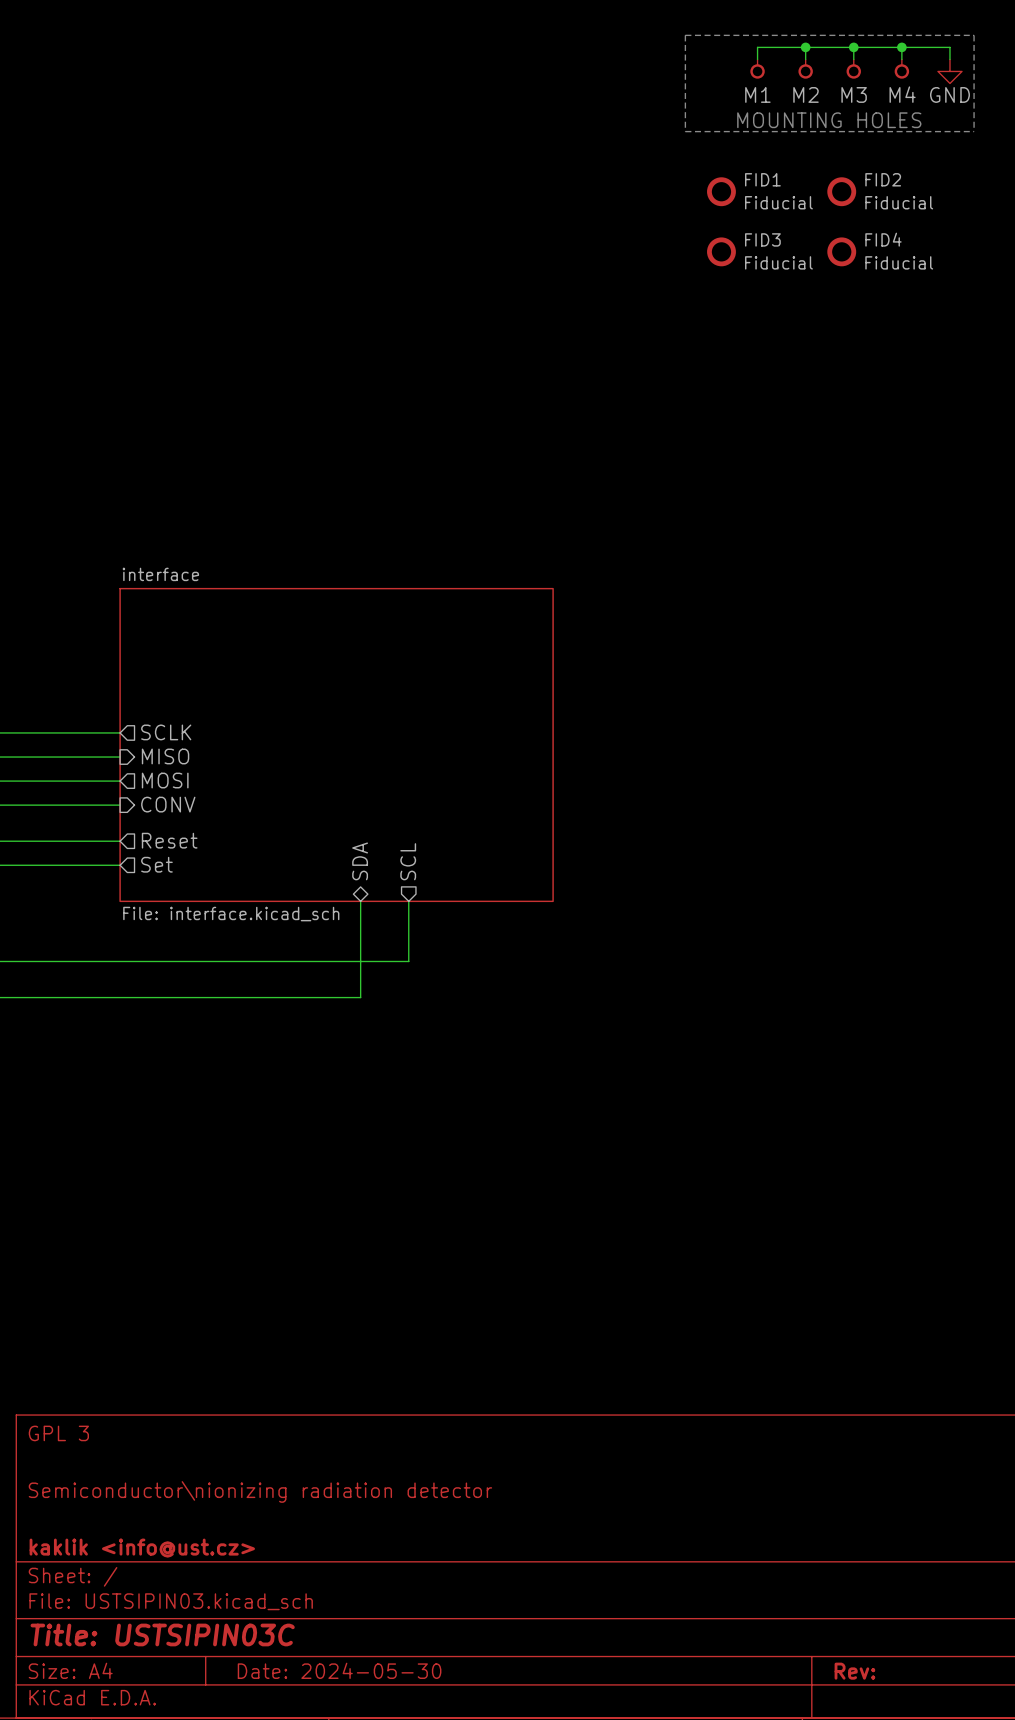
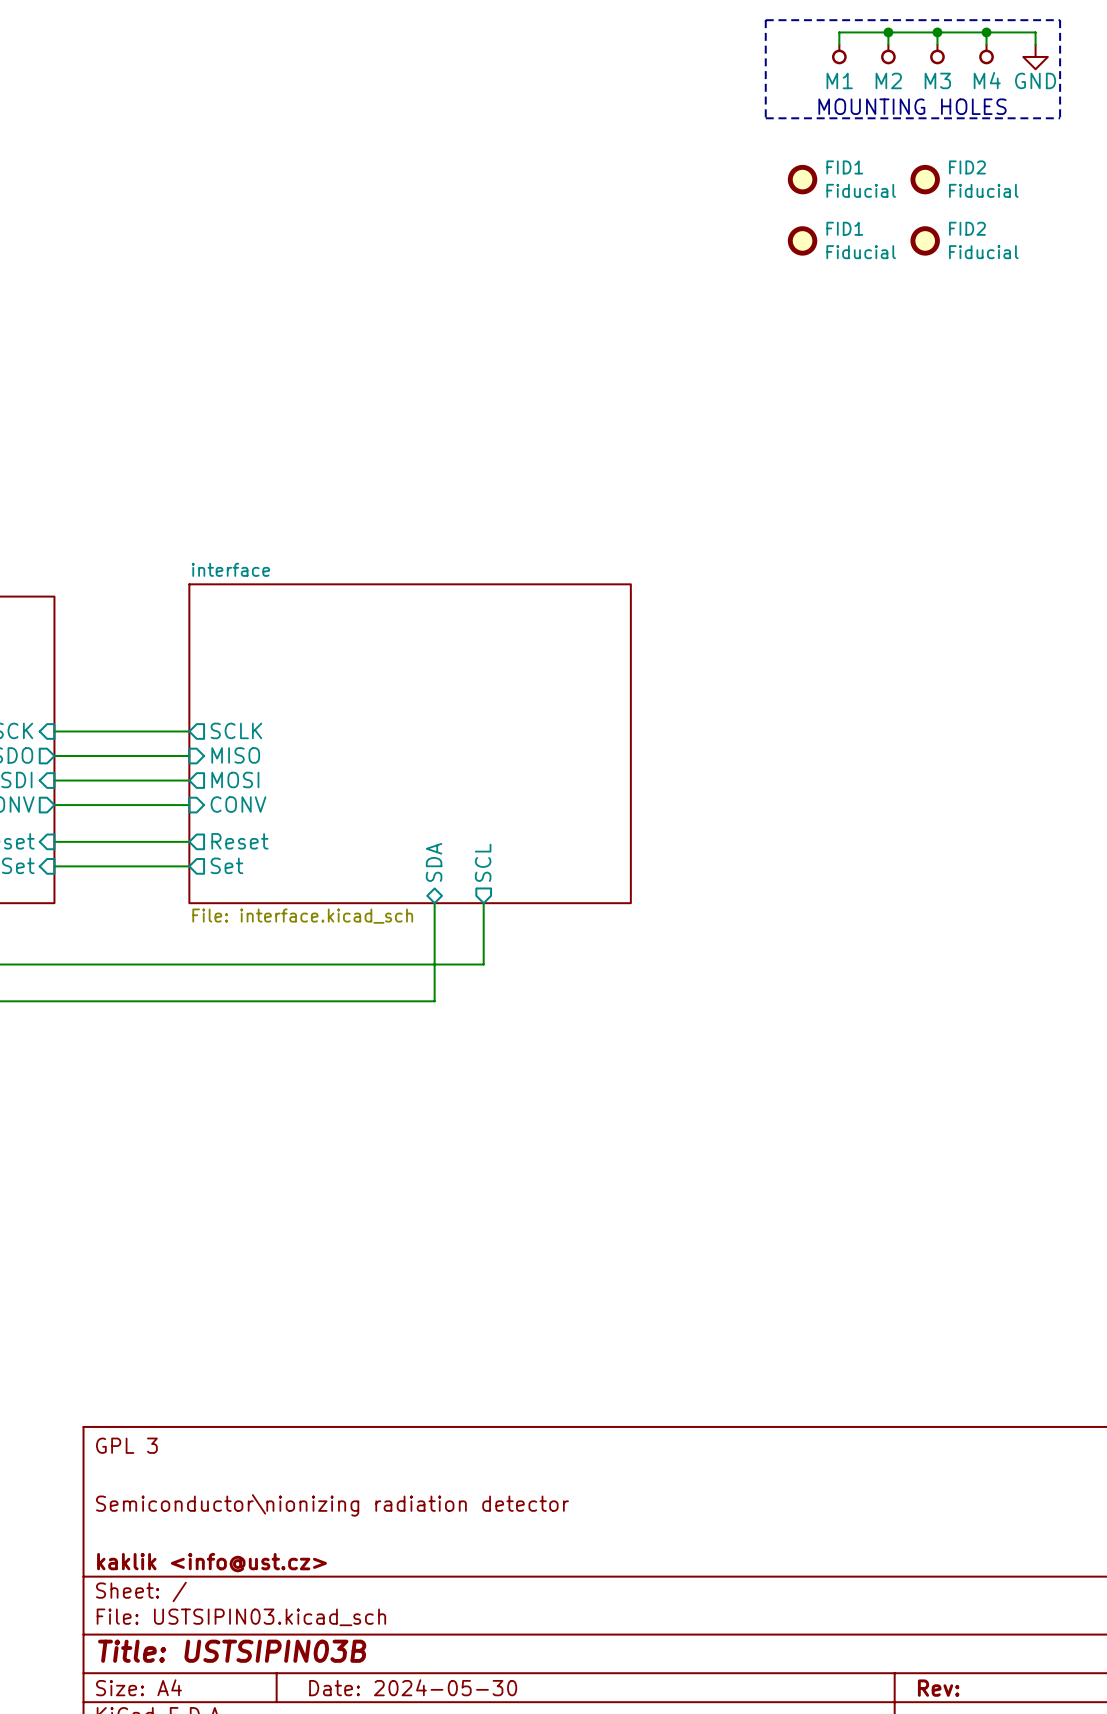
FID3 name: FID3 (762, 239) -> FID1 (844, 228)
FID4 name: FID4 (883, 239) -> FID2 (967, 228)
title block: Title: USTSIPIN03C (162, 1634) -> Title: USTSIPIN03B (232, 1651)

